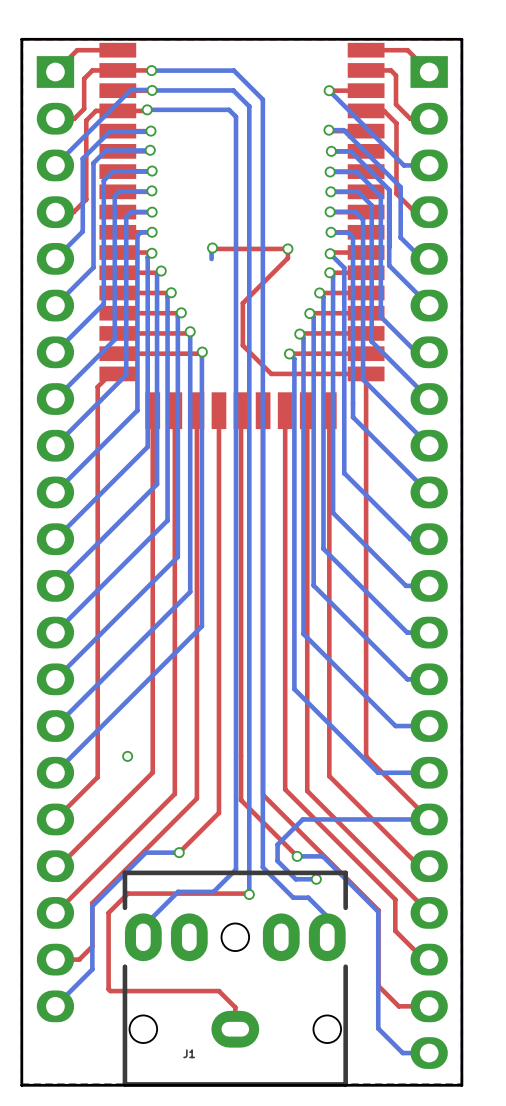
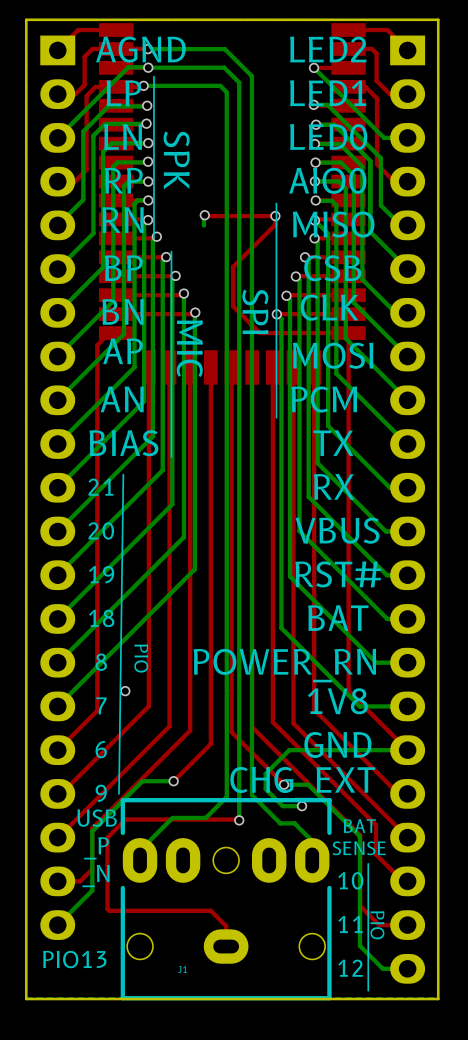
text: none -> AGND (140, 49)
text: none -> LED2 (328, 49)
line: none -> (153, 76) (153, 238)
text: none -> LP (123, 93)
text: none -> LED1 (328, 93)
text: none -> LN (122, 136)
text: none -> LED0 (328, 137)
text: none -> SPK (176, 160)
text: none -> RP (123, 180)
text: none -> AIO0 (327, 180)
line: none -> (276, 203) (276, 417)
text: none -> RN (122, 220)
text: none -> MISO (333, 224)
line: none -> (171, 251) (171, 457)
text: none -> BP (123, 268)
text: none -> CSB (332, 268)
text: none -> CLK (329, 307)
text: none -> BN (122, 311)
text: none -> SPI (255, 311)
text: none -> MIC (189, 348)
text: none -> AP (122, 351)
text: none -> MOSI (333, 355)
text: none -> AN (122, 399)
text: none -> PCM (324, 399)
text: none -> BIAS (123, 443)
text: none -> TX (333, 443)
line: none -> (123, 474) (118, 793)
text: none -> 21 (100, 487)
text: none -> RX (334, 486)
text: none -> VBUS (337, 530)
text: none -> 20 (101, 530)
text: none -> 19 (101, 574)
text: none -> RST# (338, 574)
text: none -> 18 (101, 618)
text: none -> BAT (338, 617)
text: none -> PIO (141, 658)
text: none -> 8 (101, 662)
text: none -> POWER_RN (284, 665)
text: none -> 1V8 (337, 701)
text: none -> 7 (101, 705)
text: none -> GND (337, 744)
text: none -> 6 (101, 749)
text: none -> CHG_EXT (302, 783)
text: none -> 9 (101, 793)
text: none -> USB (97, 818)
text: none -> BAT (359, 826)
text: none -> _P (96, 848)
text: none -> SENSE (359, 848)
line: none -> (368, 863) (368, 990)
text: none -> _N (95, 876)
text: none -> 10 (350, 880)
text: none -> 11 (350, 924)
text: none -> PIO (377, 925)
text: none -> PIO13 (74, 959)
text: none -> 12 (350, 968)

